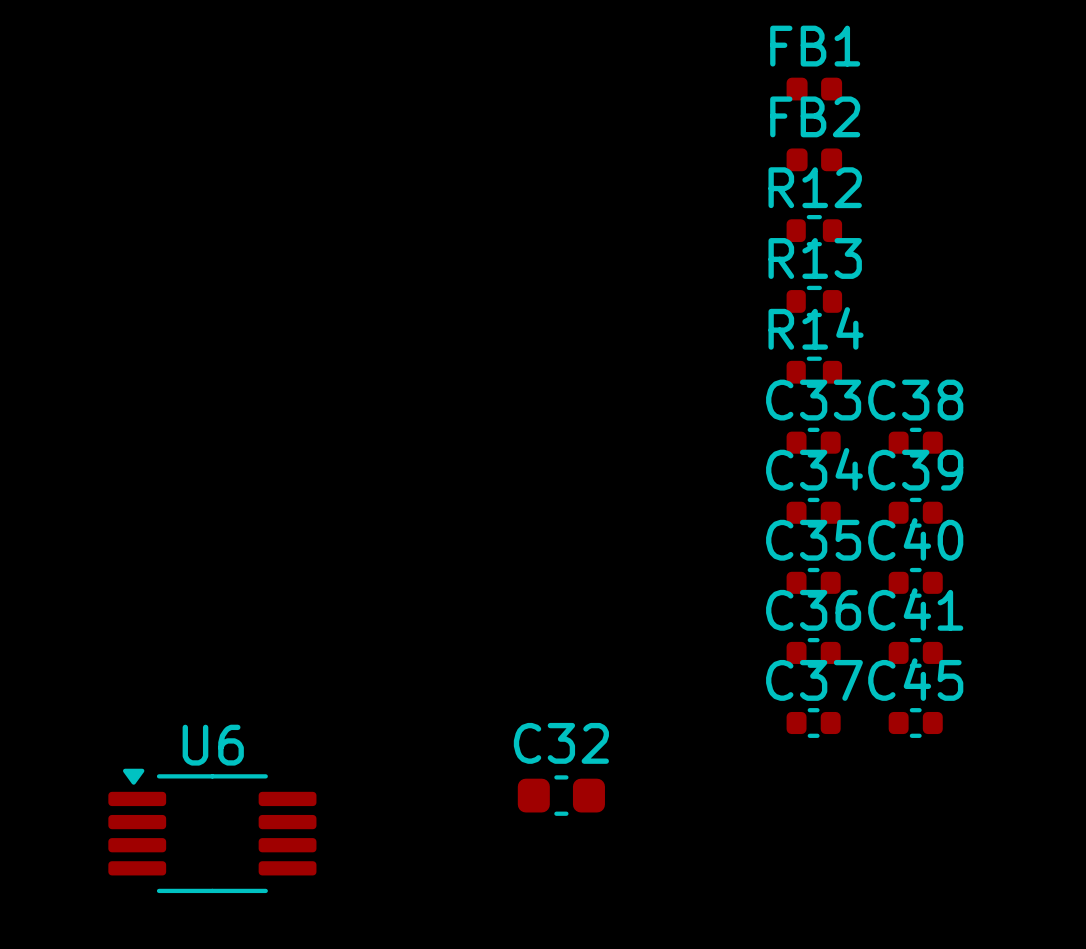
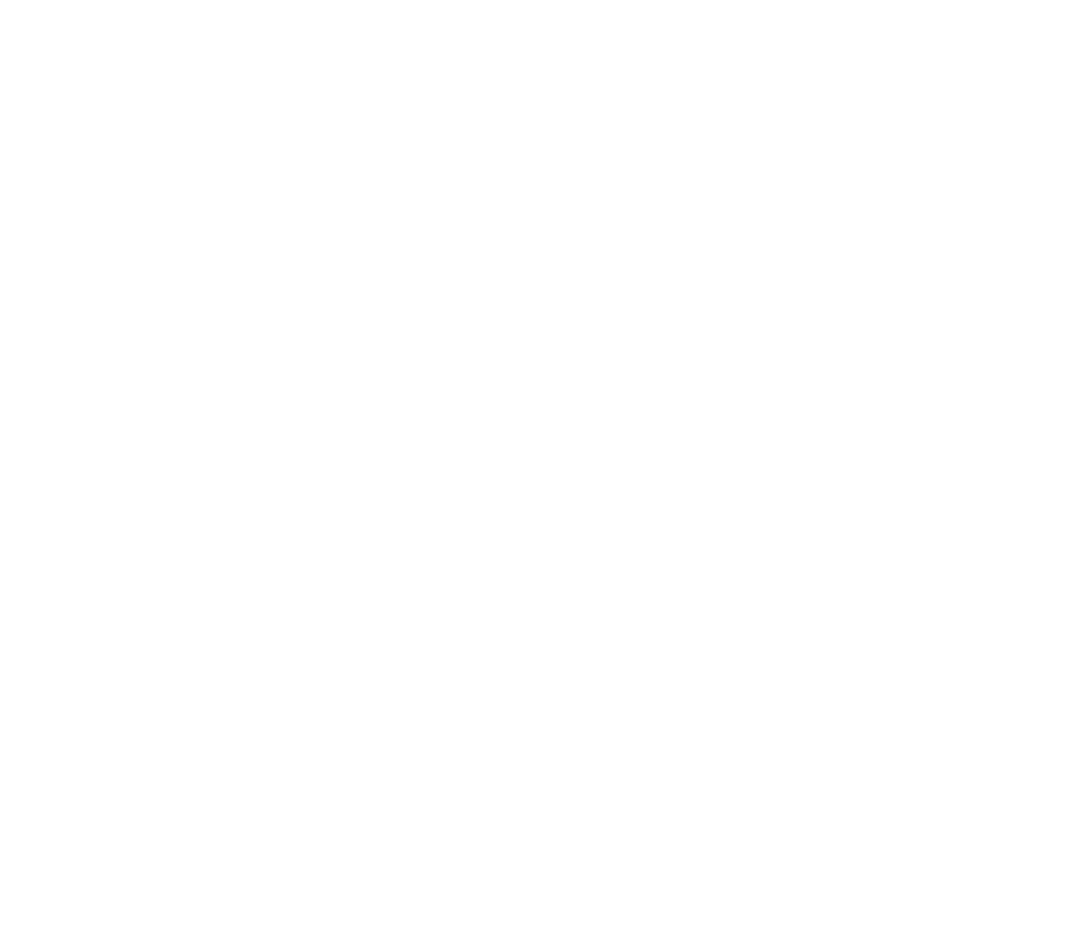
FB1: (814, 89) -> none
FB2: (814, 159) -> none
R12: (814, 230) -> none
R13: (814, 301) -> none
R14: (814, 372) -> none
C33: (813, 442) -> none
C38: (915, 442) -> none
C34: (813, 512) -> none
C39: (915, 512) -> none
C35: (813, 582) -> none
C40: (915, 582) -> none
C36: (813, 652) -> none
C41: (915, 652) -> none
C37: (813, 723) -> none
C45: (915, 723) -> none
C32: (561, 795) -> none
U6: (212, 830) -> none

